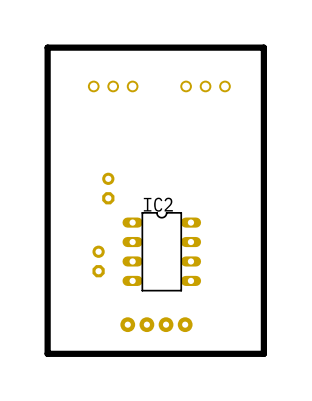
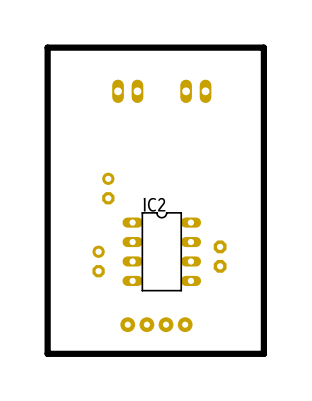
part: (113, 86) -> none
part: (205, 86) -> none
part: none -> (127, 91)
part: none -> (195, 91)
part: none -> (220, 256)

